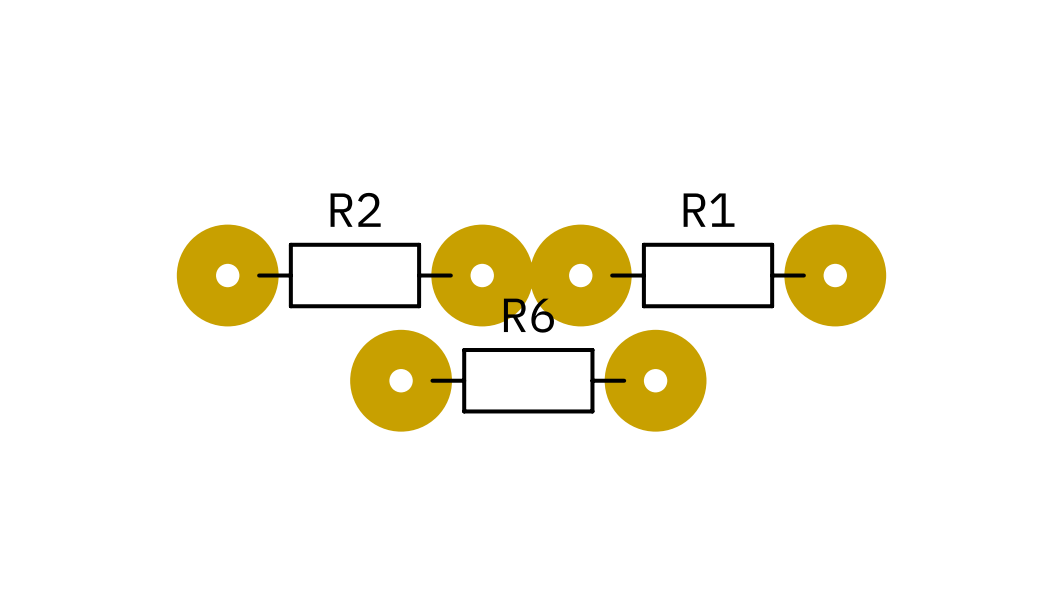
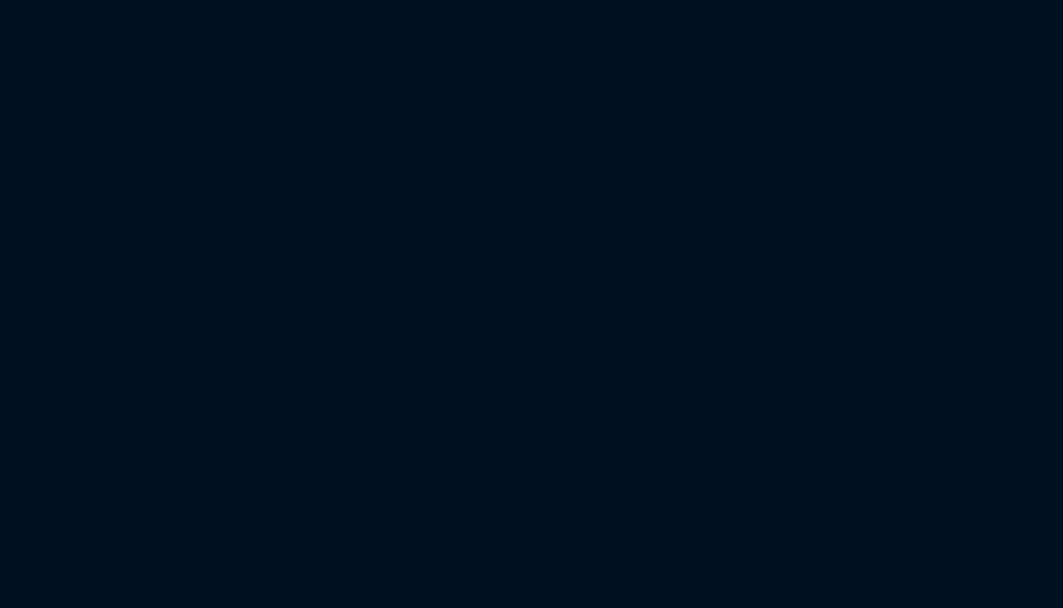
R2: (354, 275) -> none
R1: (708, 275) -> none
R6: (528, 380) -> none

